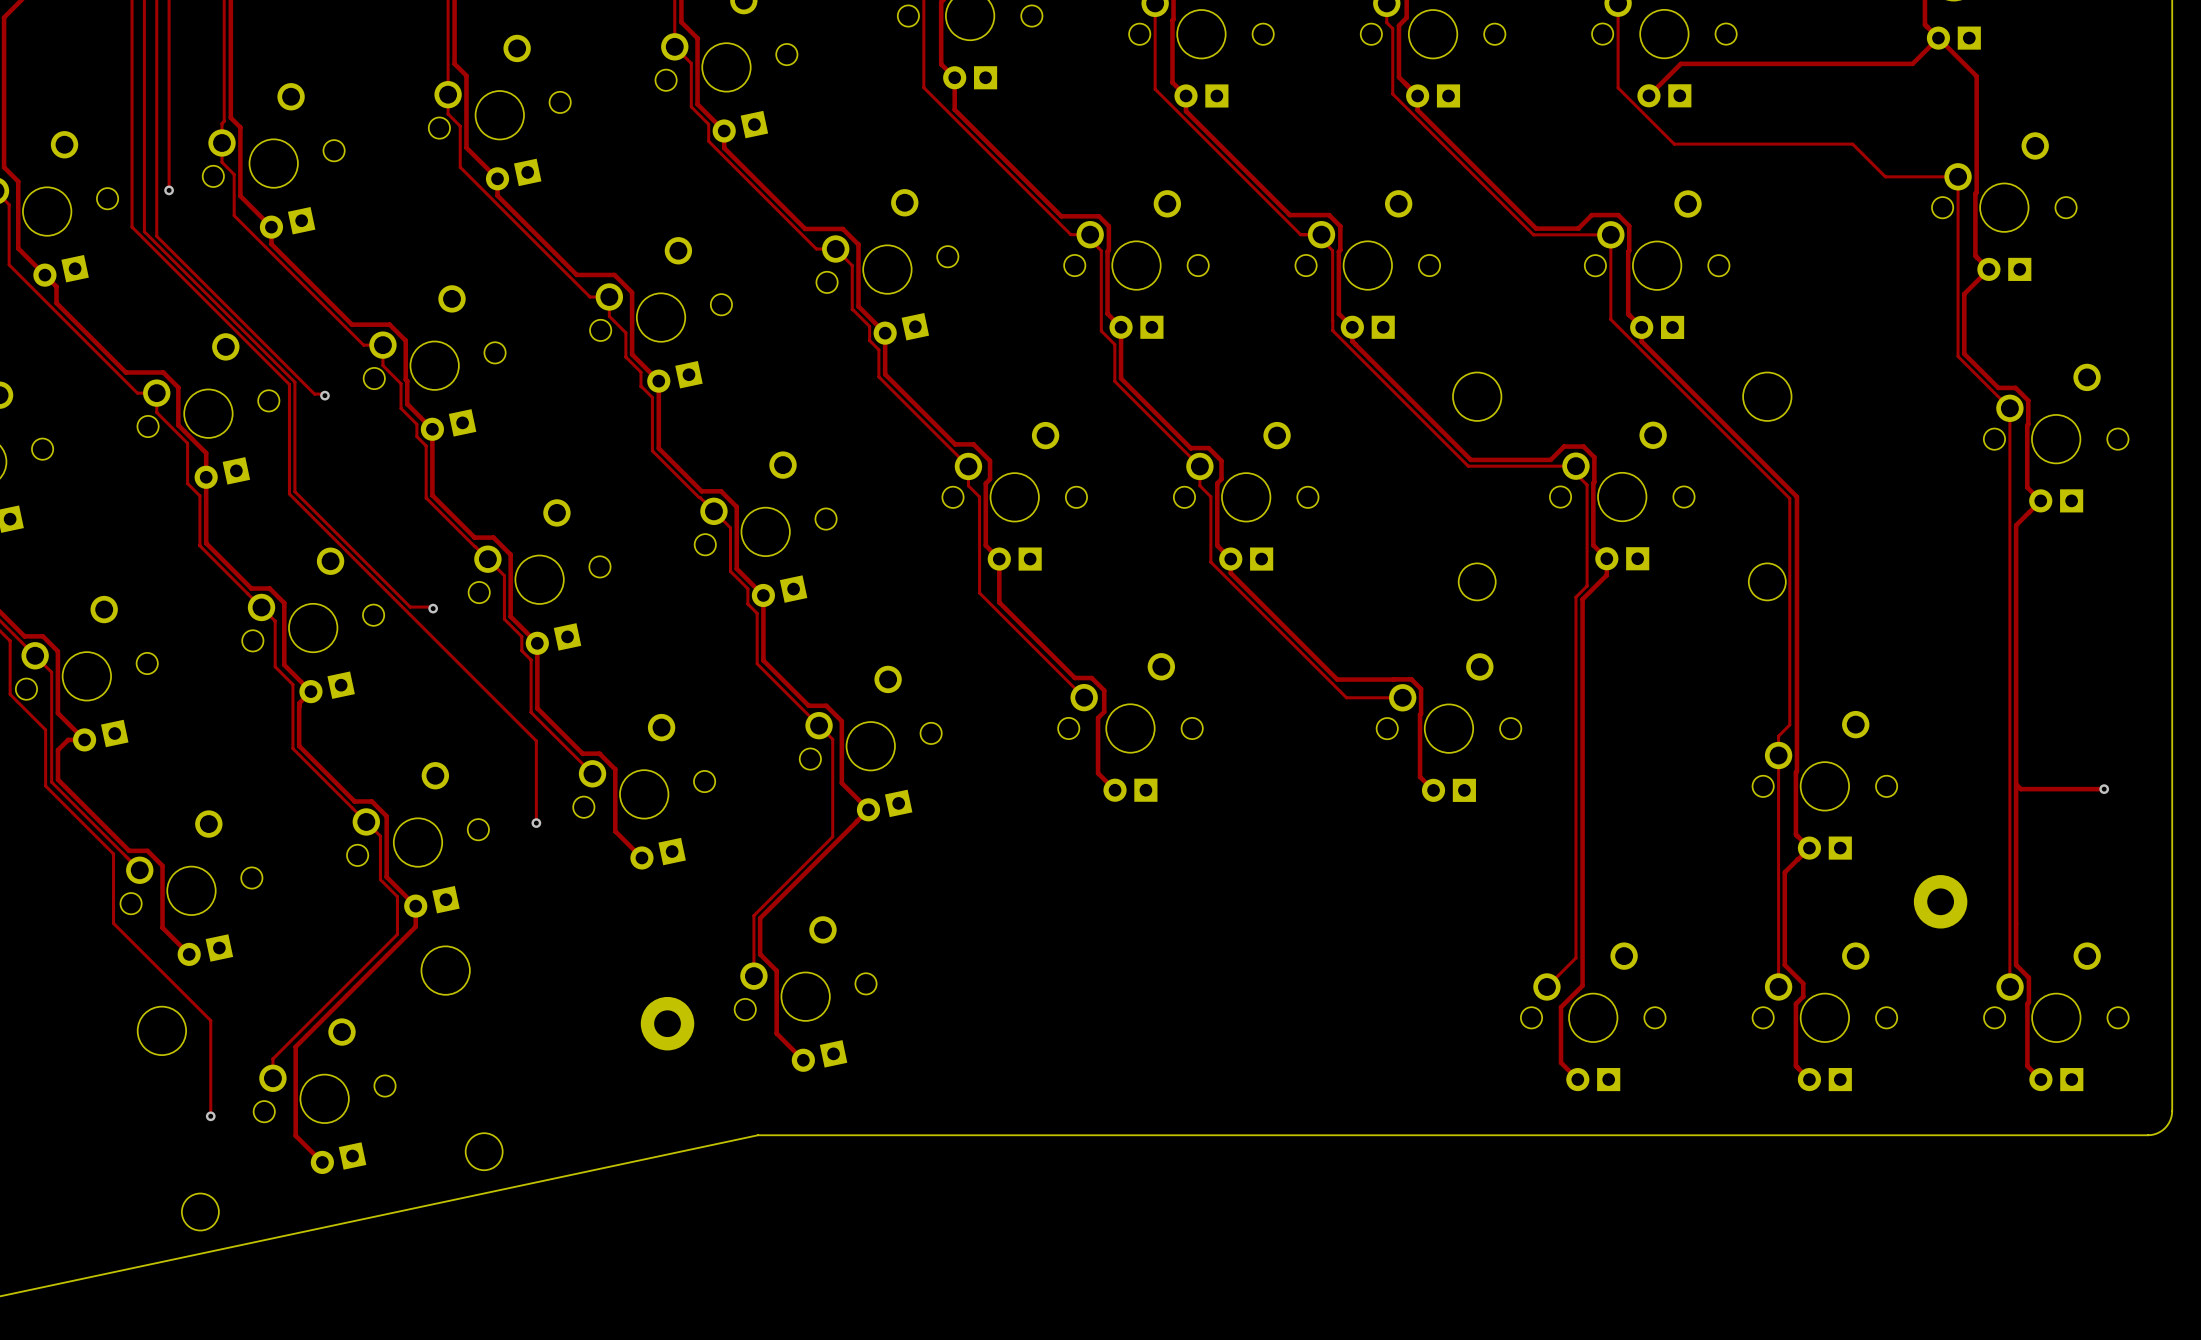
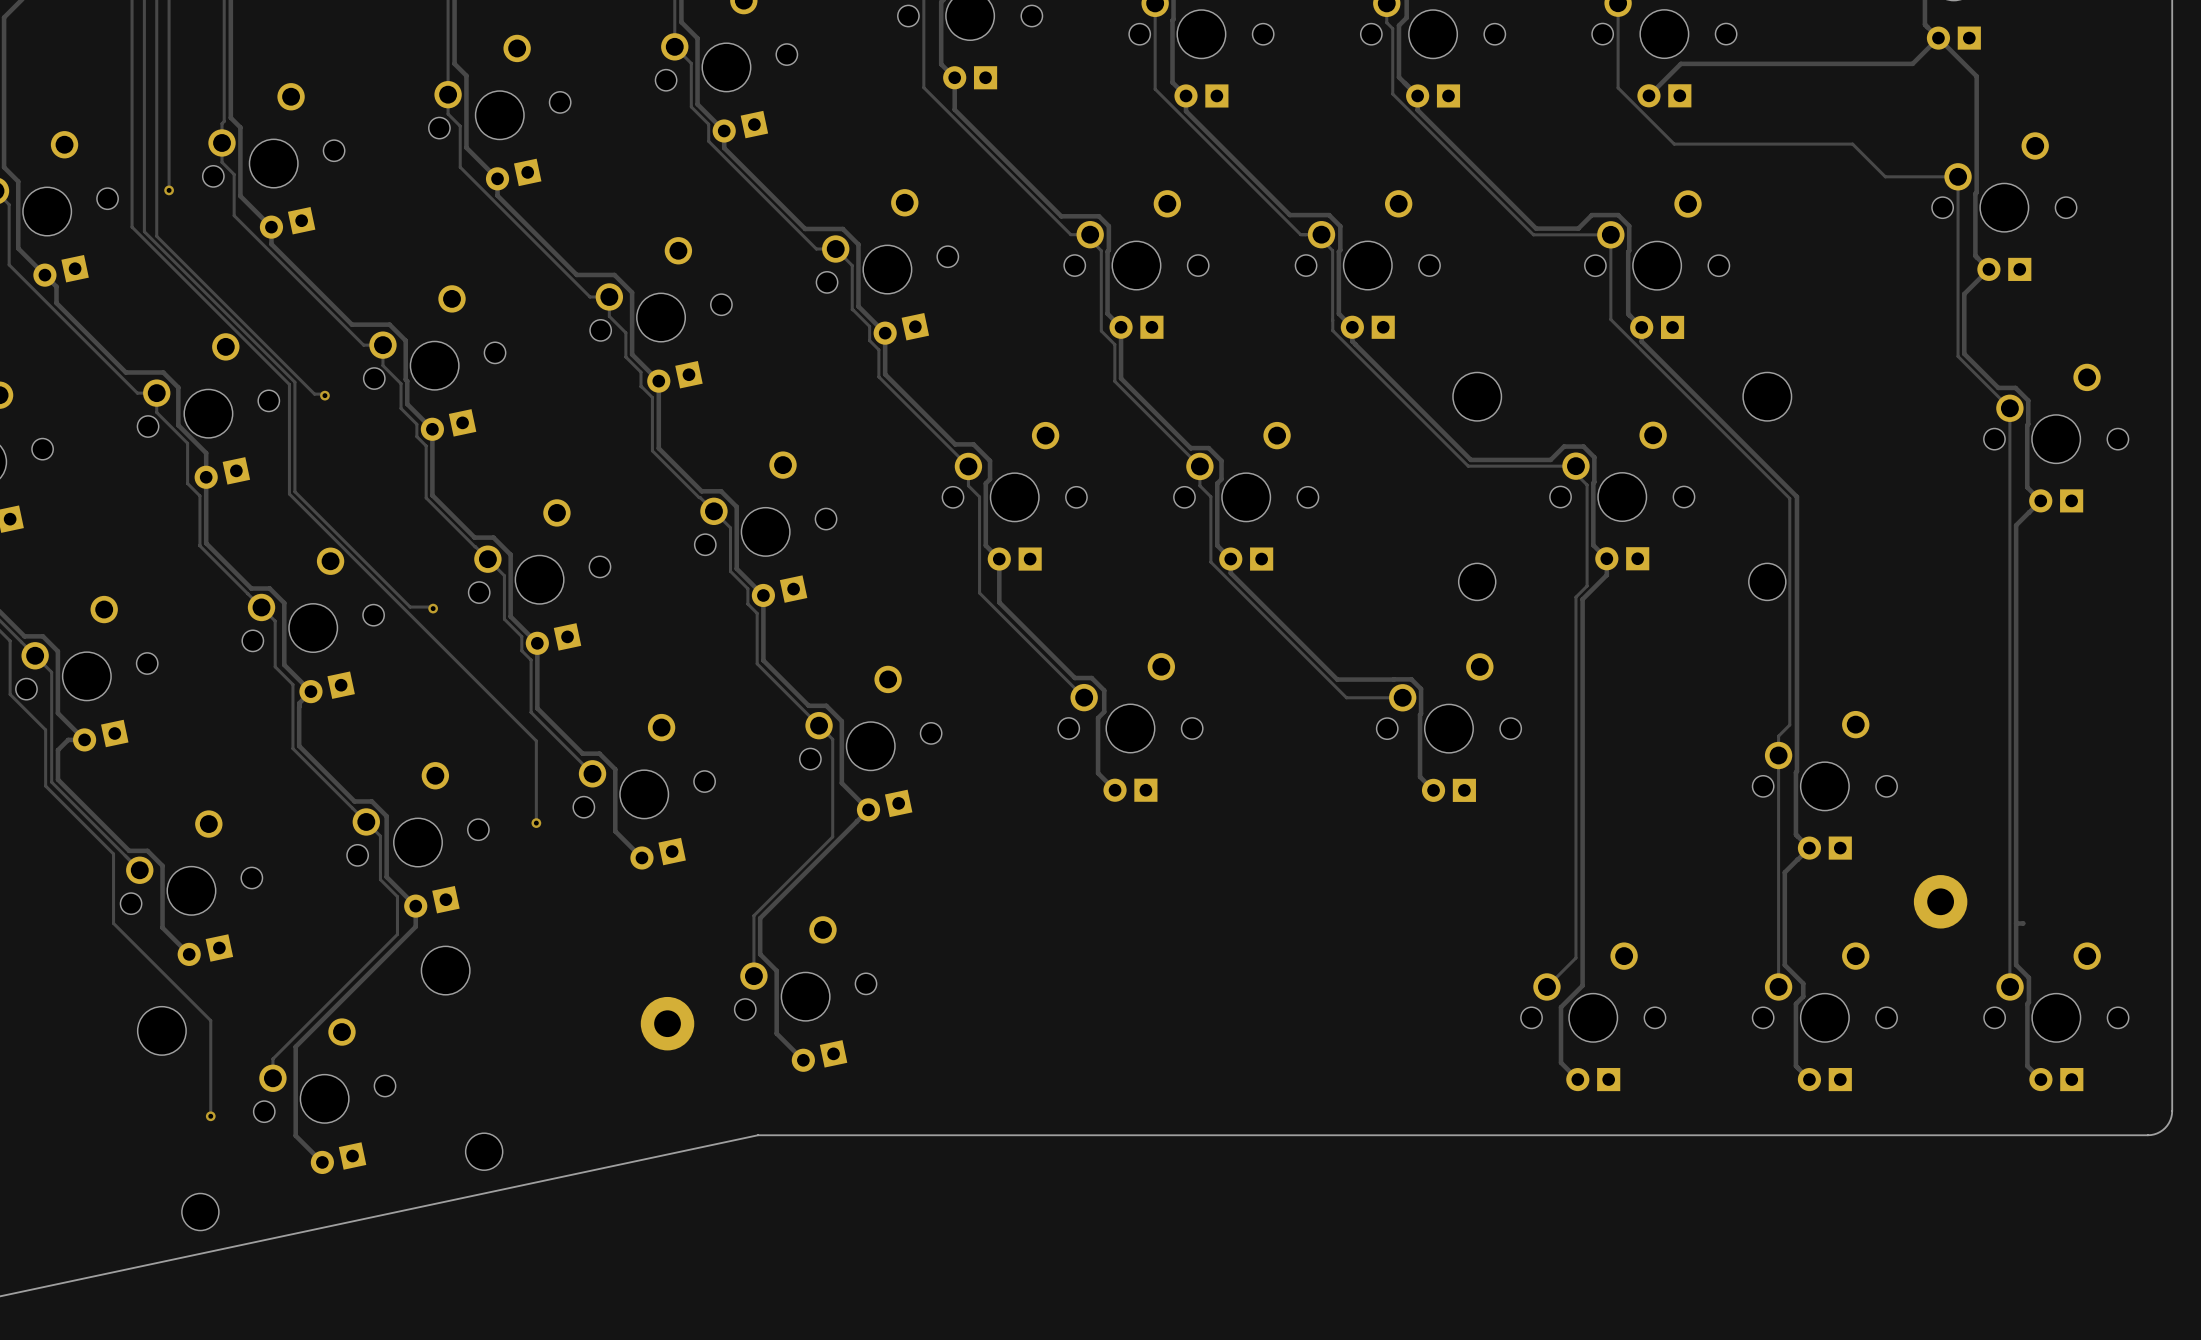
track: (2016, 784) (2020, 789) (2104, 789) -> none
via: (2104, 789) -> none
track: none -> (2016, 923) (2023, 923)

